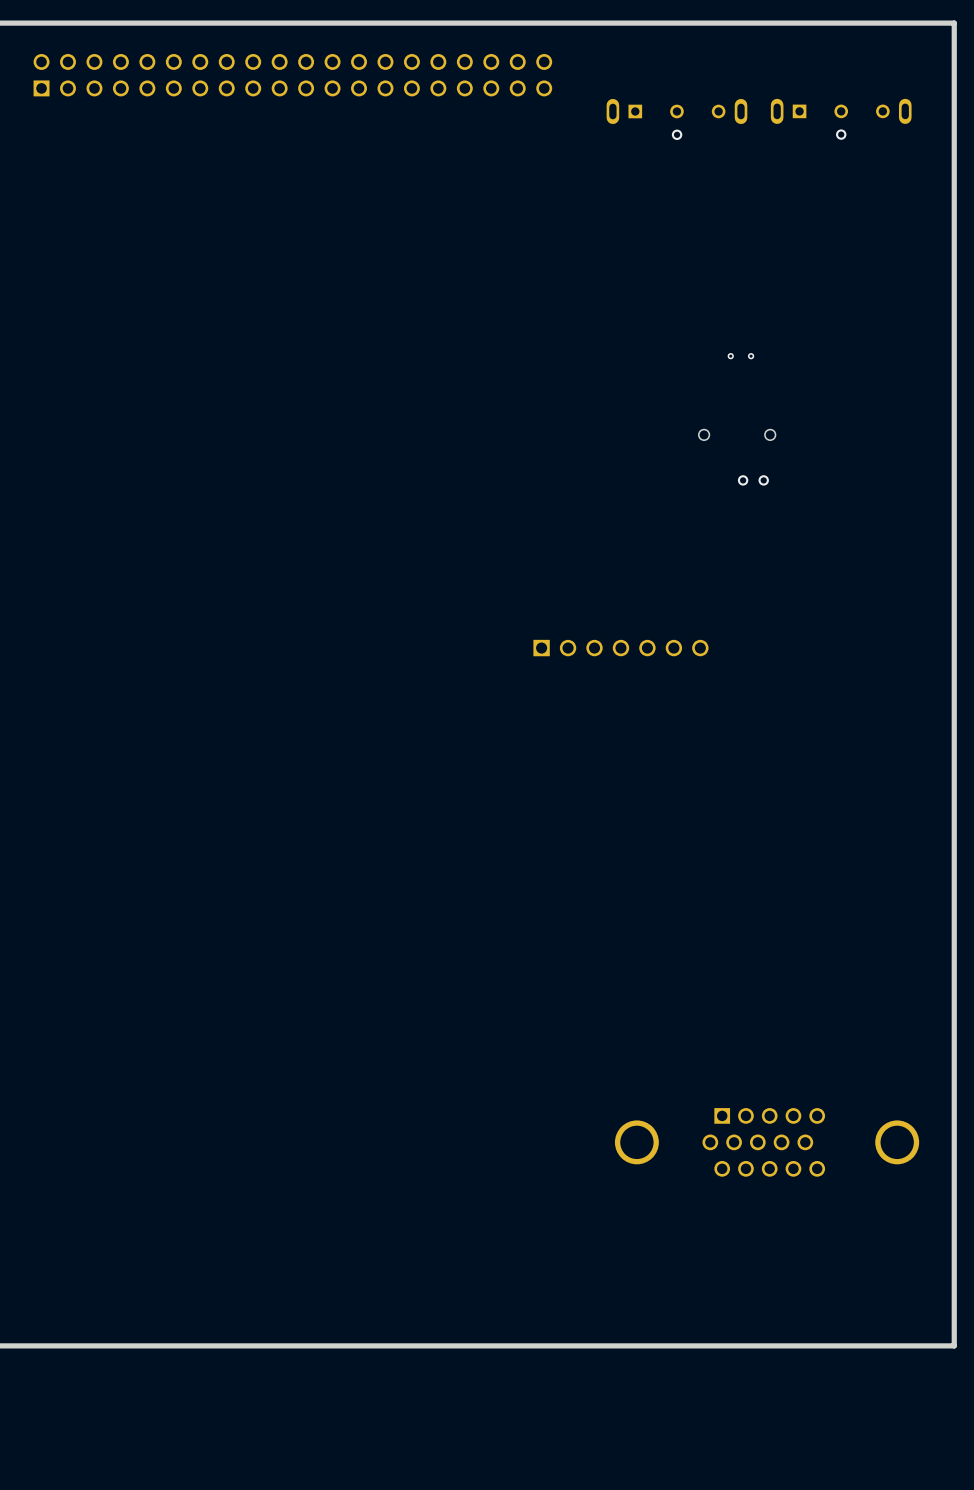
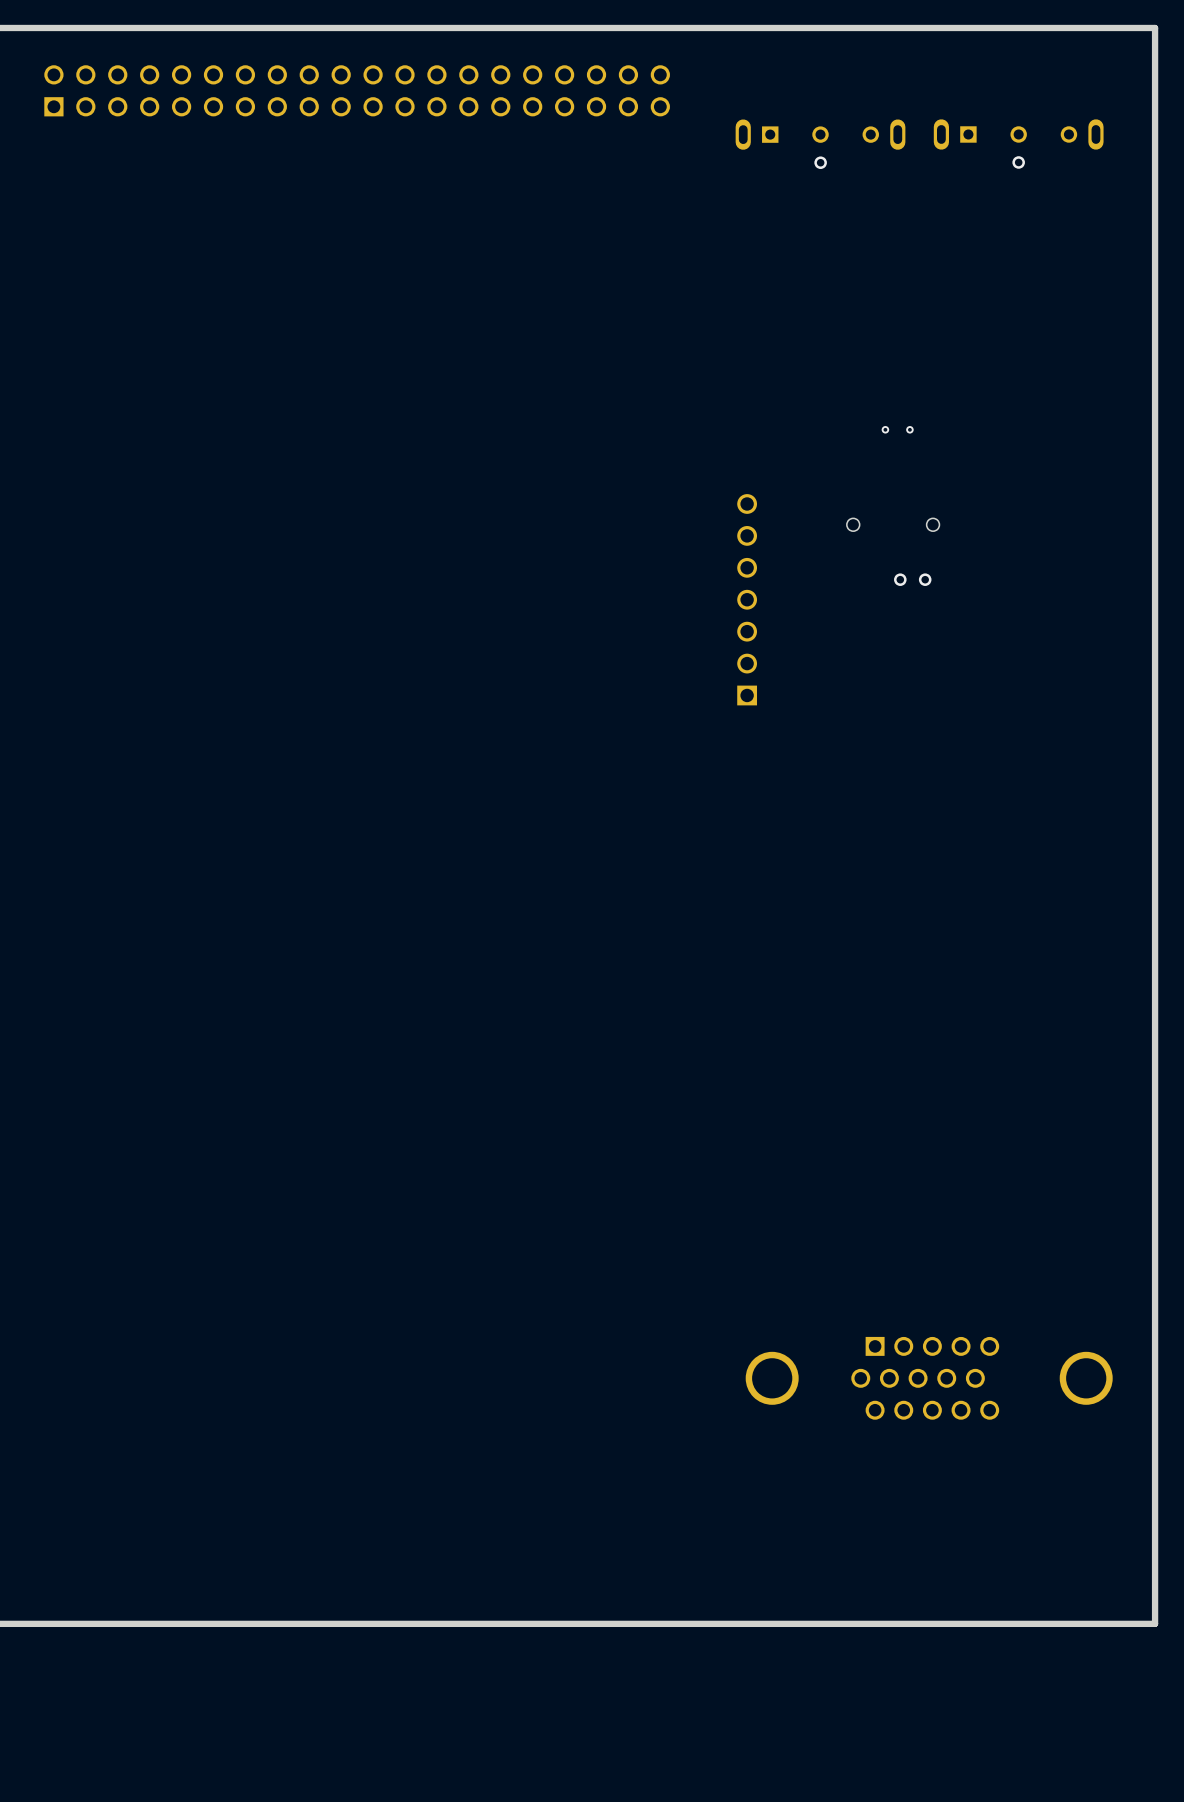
part rotation: 0° (620, 648) -> 90° counterclockwise (747, 599)
part position: (620, 648) -> (747, 599)

